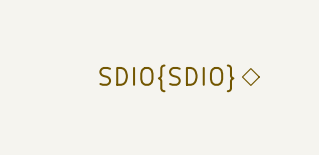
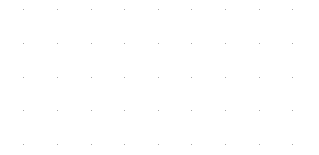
hierarchical label: SDIO{SDIO} (166, 78) -> none

